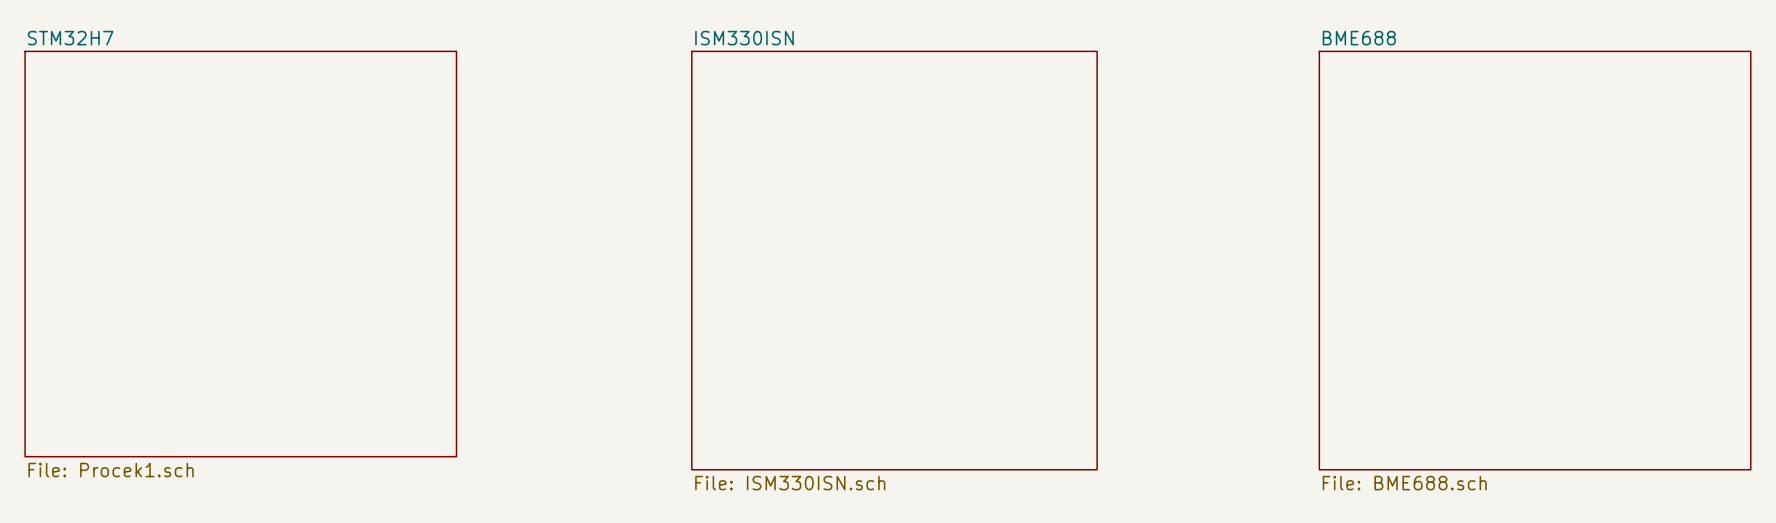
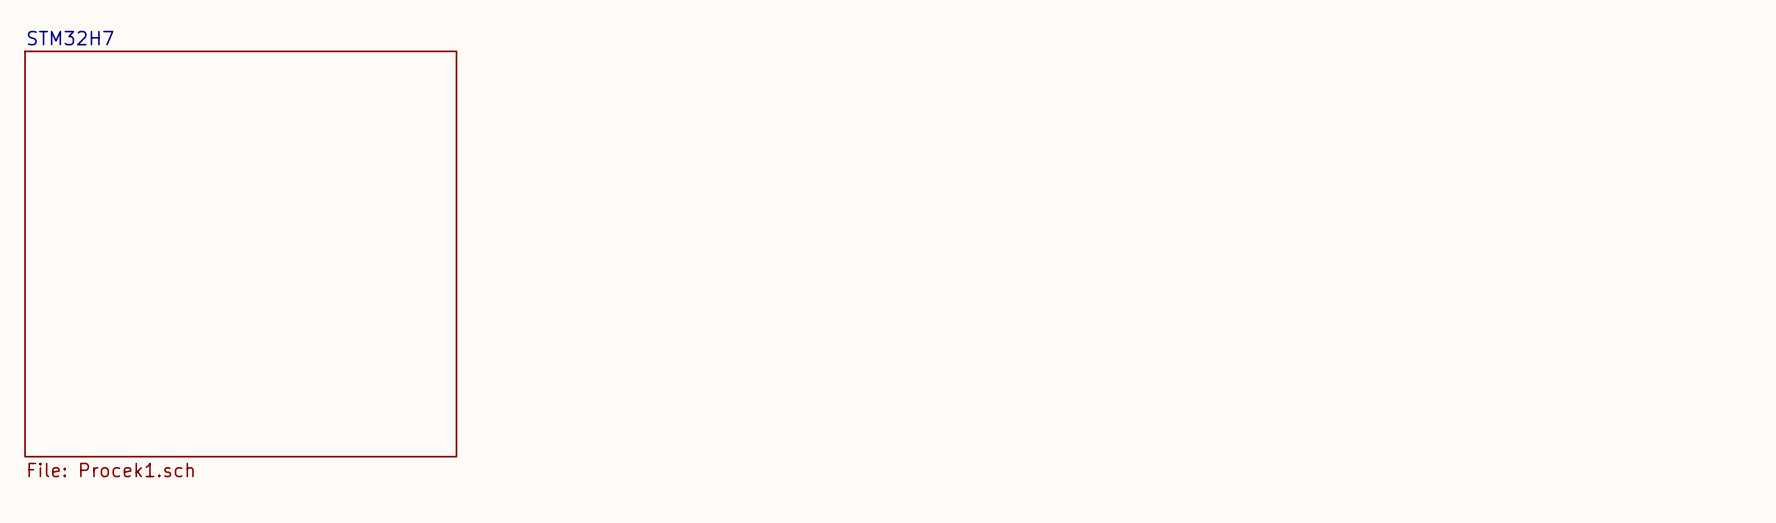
sheet ISM330ISN: File: ISM330ISN.sch (894, 260) -> none
sheet BME688: File: BME688.sch (1535, 260) -> none

